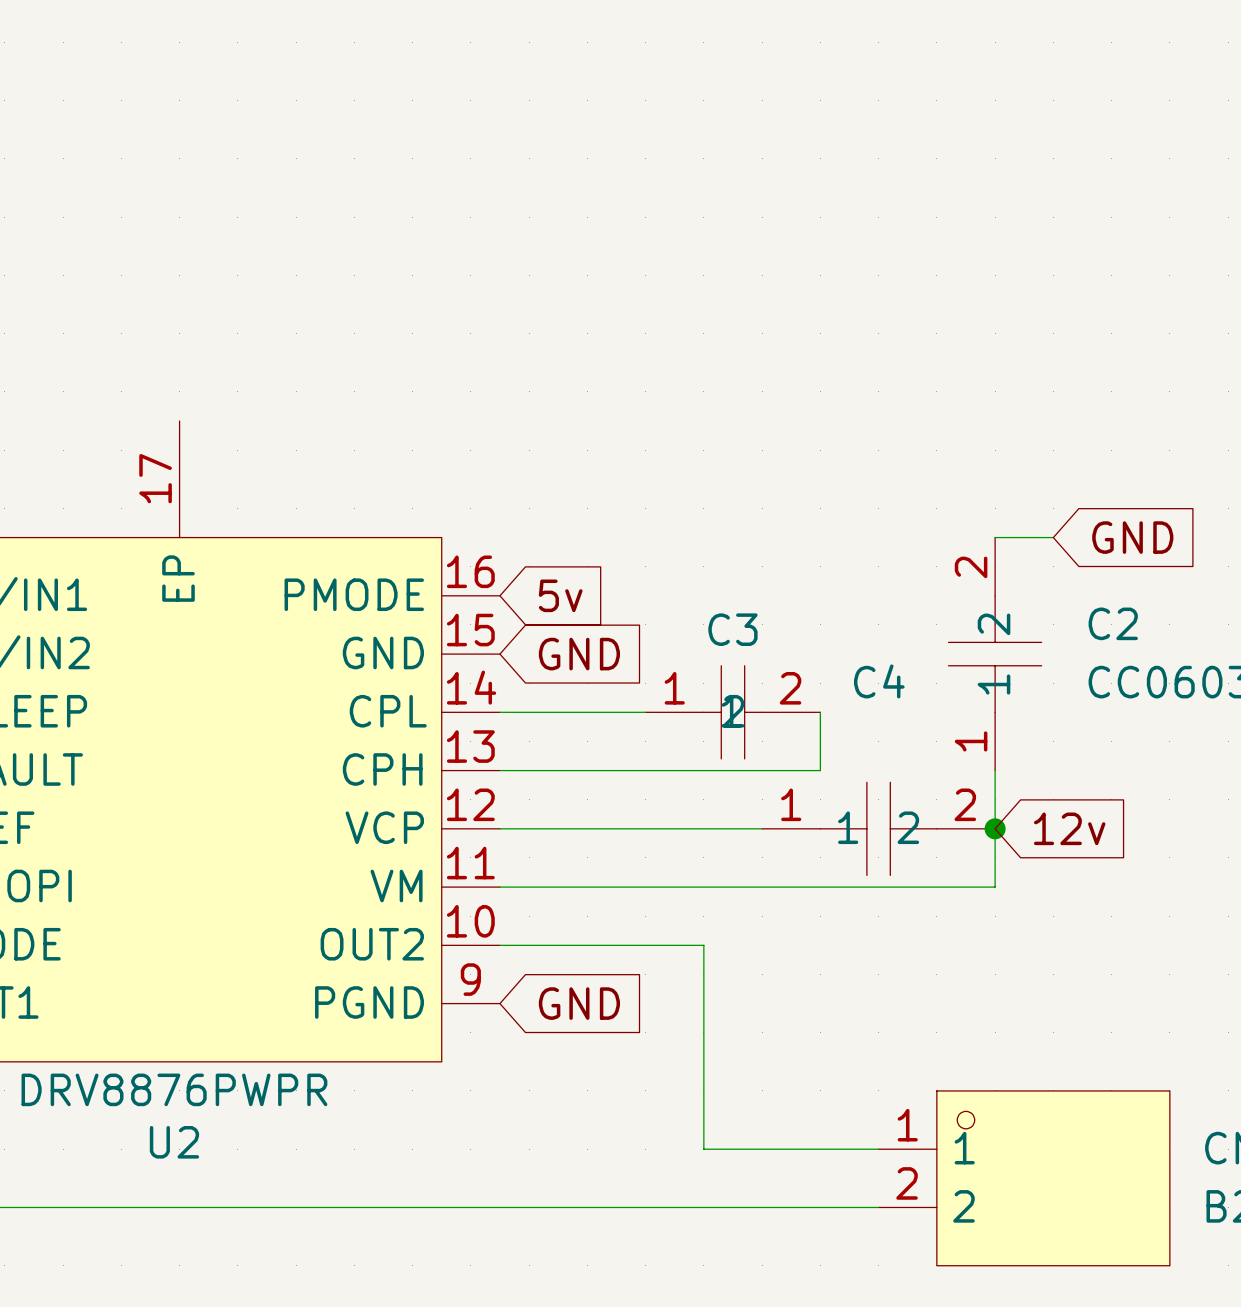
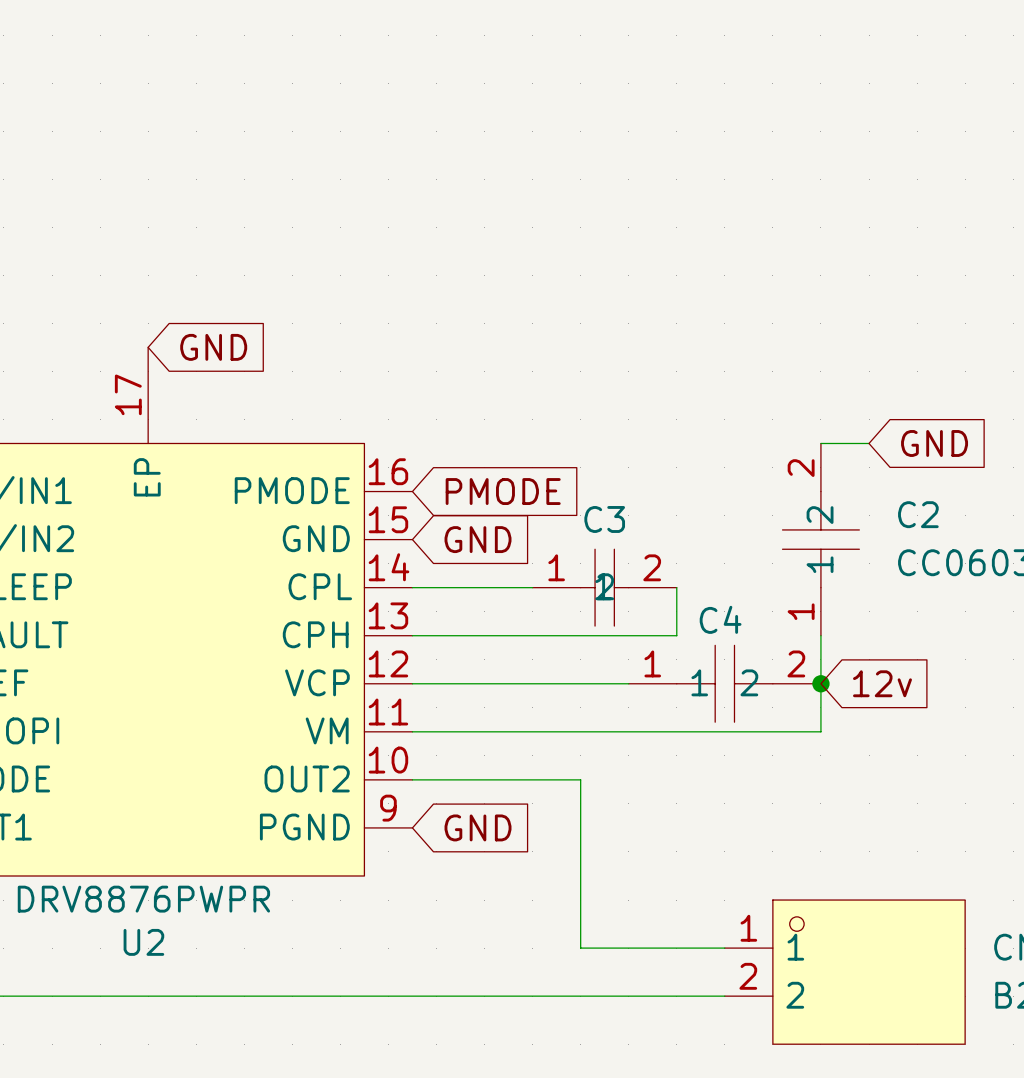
global label: none -> GND (213, 347)
global label: 5v (560, 595) -> PMODE (503, 491)
C4 name position: C4 (879, 681) -> C4 (720, 619)

